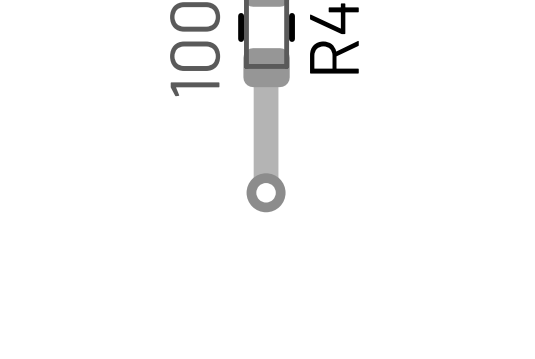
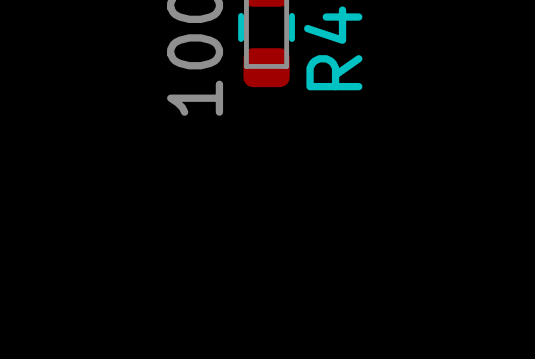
track: (266, 68) (266, 192) -> none
via: (266, 192) -> none

